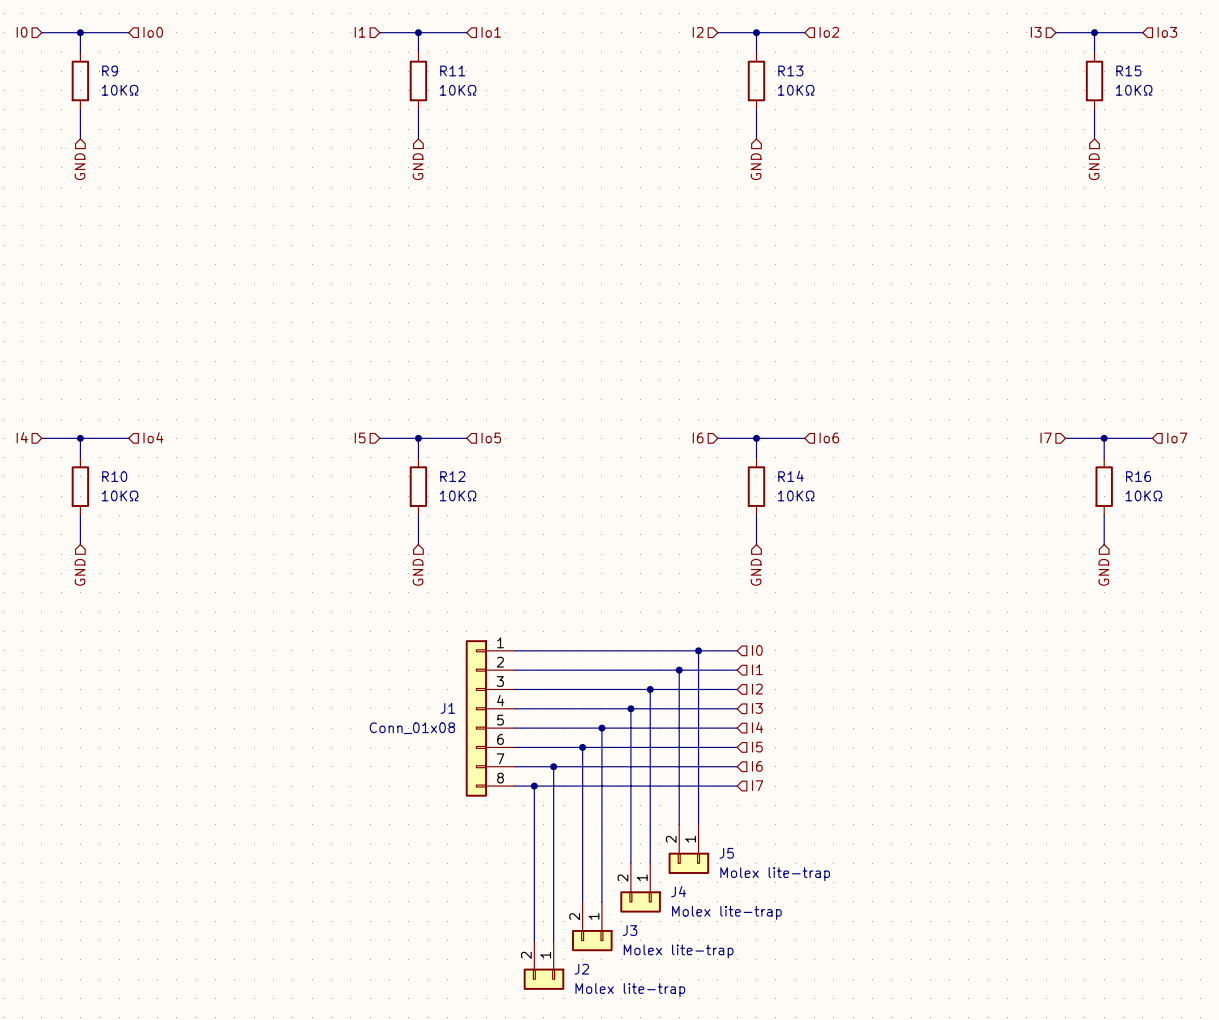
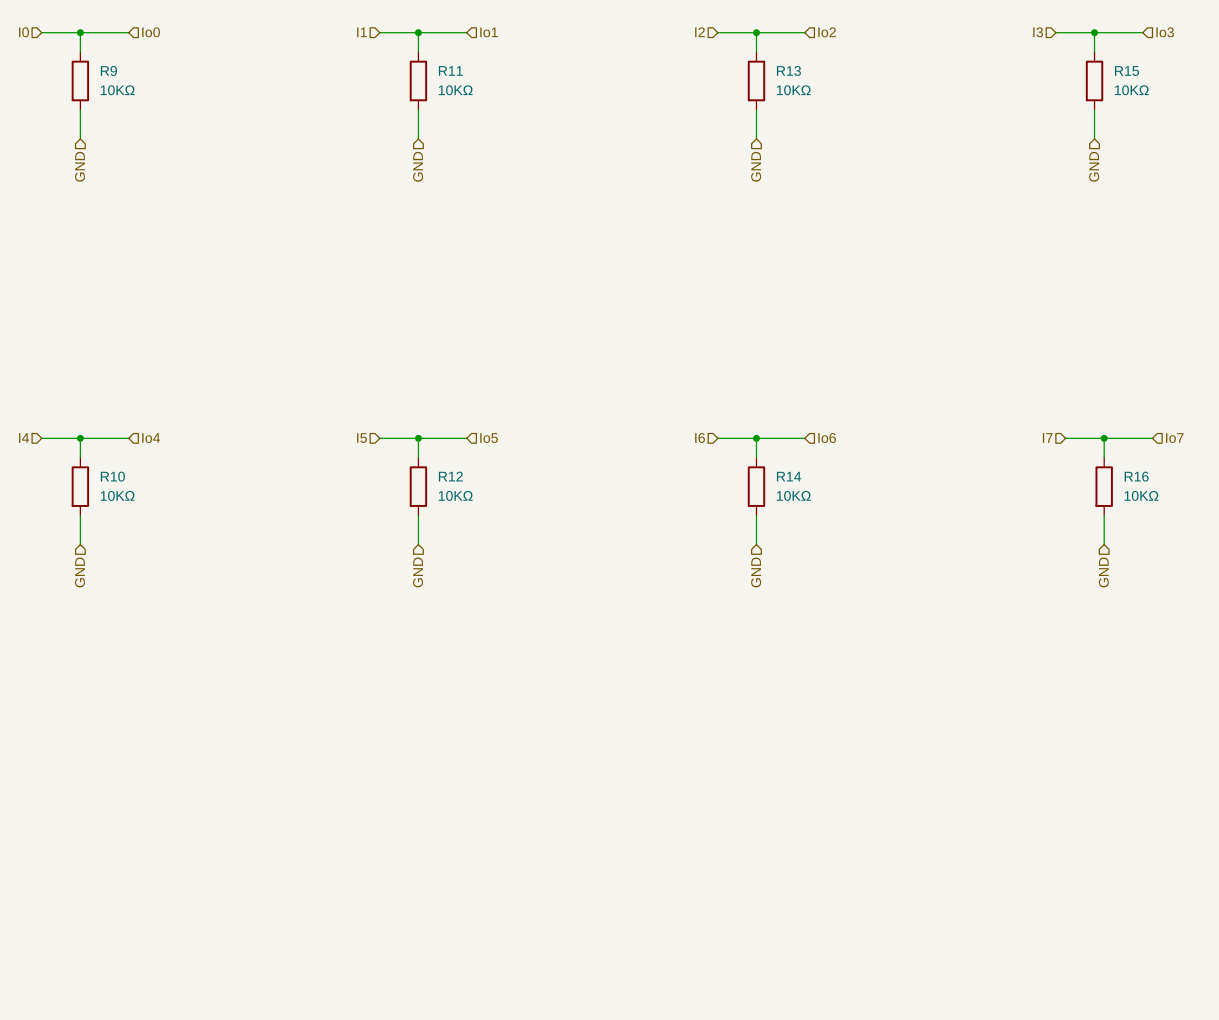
wire: (515, 650) (737, 650) -> none
wire: (698, 650) (698, 824) -> none
junction: (698, 650) -> none
hierarchical label: I0 (757, 650) -> none
hierarchical label: I1 (757, 669) -> none
wire: (515, 670) (737, 670) -> none
wire: (679, 670) (679, 824) -> none
junction: (679, 670) -> none
wire: (515, 689) (737, 689) -> none
wire: (650, 689) (650, 863) -> none
junction: (650, 689) -> none
hierarchical label: I2 (757, 689) -> none
wire: (515, 708) (737, 708) -> none
wire: (630, 708) (630, 863) -> none
junction: (630, 708) -> none
hierarchical label: I3 (757, 708) -> none
J1: Conn_01x08 (490, 718) -> none
hierarchical label: I4 (757, 727) -> none
wire: (515, 728) (737, 728) -> none
wire: (601, 728) (601, 901) -> none
junction: (601, 728) -> none
wire: (515, 747) (737, 747) -> none
wire: (582, 747) (582, 901) -> none
junction: (582, 747) -> none
hierarchical label: I5 (757, 747) -> none
wire: (515, 766) (737, 766) -> none
wire: (553, 766) (553, 940) -> none
junction: (553, 766) -> none
hierarchical label: I6 (757, 766) -> none
hierarchical label: I7 (757, 785) -> none
wire: (515, 786) (737, 786) -> none
wire: (534, 786) (534, 940) -> none
junction: (534, 786) -> none
J5: Molex lite-trap (688, 849) -> none
J4: Molex lite-trap (640, 887) -> none
J3: Molex lite-trap (592, 926) -> none
J2: Molex lite-trap (543, 965) -> none

